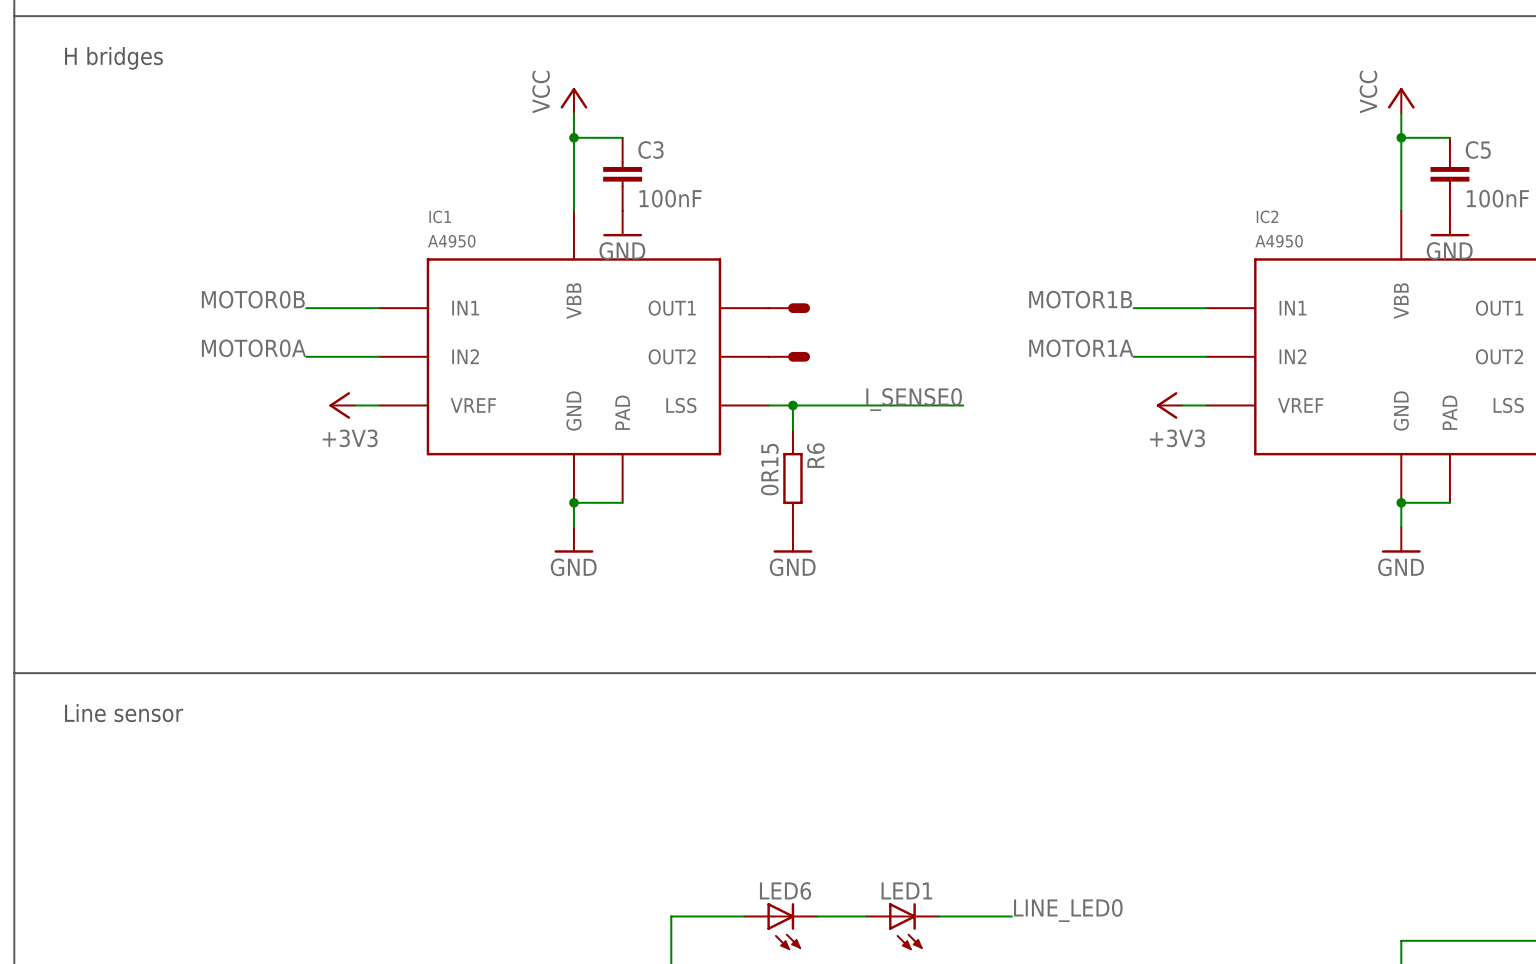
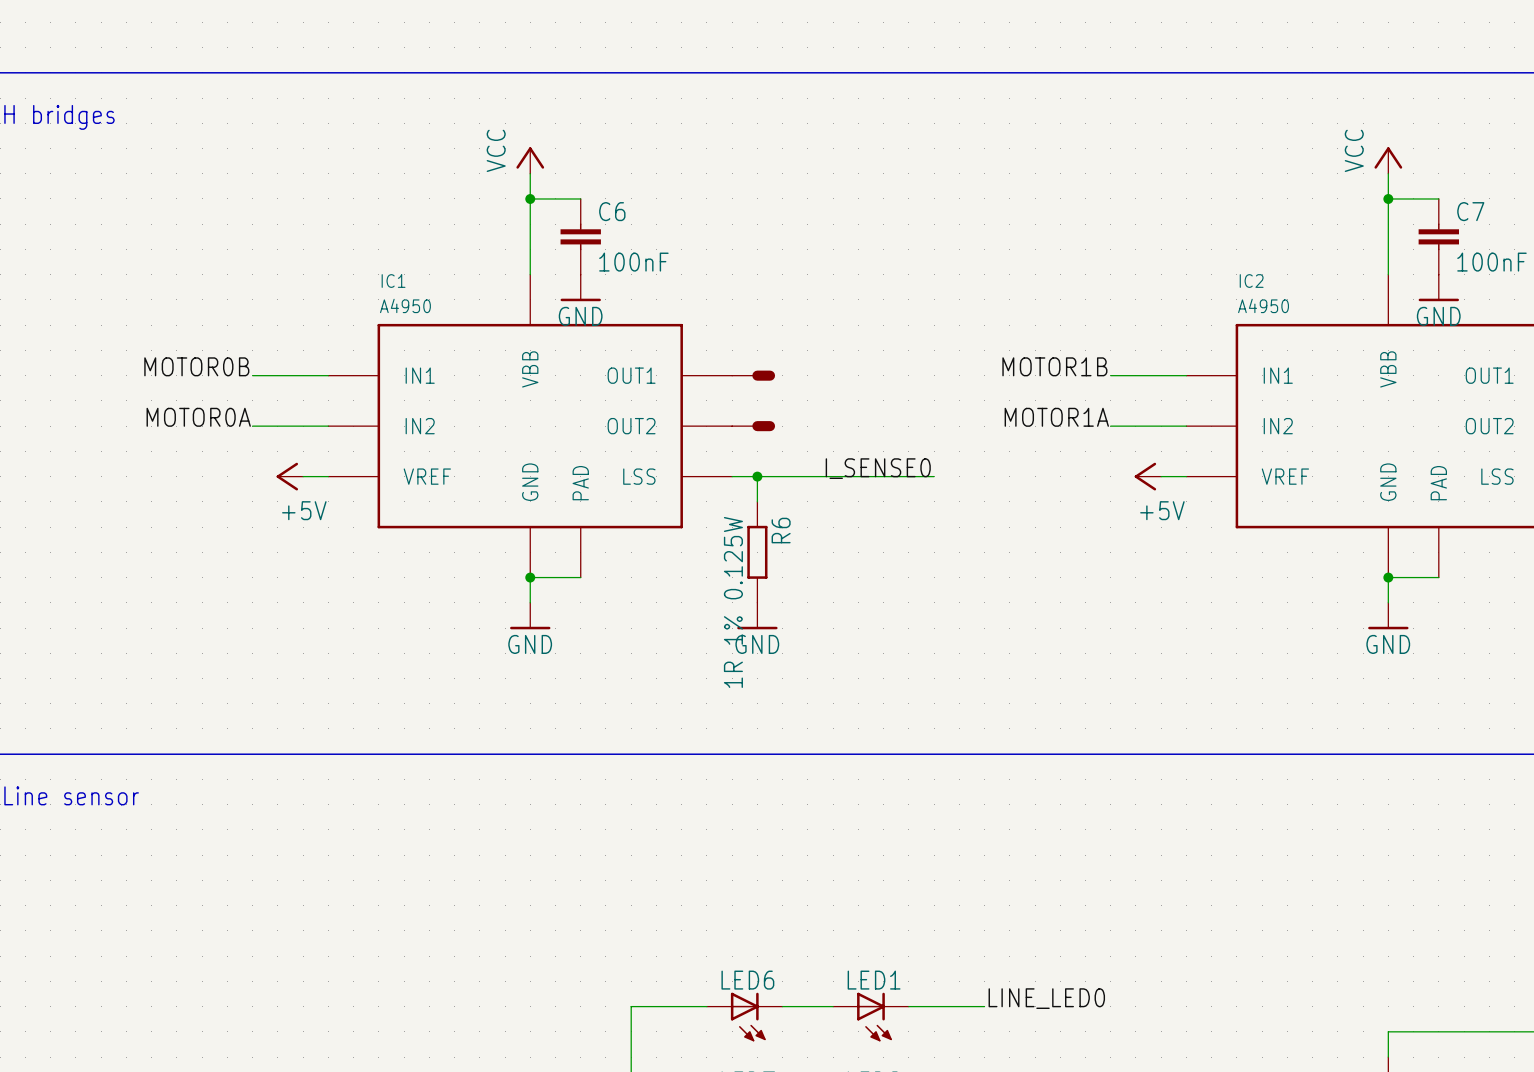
C3 name: C3 (651, 149) -> C6 (612, 211)
C5 name: C5 (1478, 149) -> C7 (1470, 211)
power symbol: +3V3 (342, 405) -> +5V (289, 476)
power symbol: +3V3 (1169, 405) -> +5V (1147, 476)
R6 value: 0R15 (769, 469) -> 1R 1% 0.125W (733, 602)

